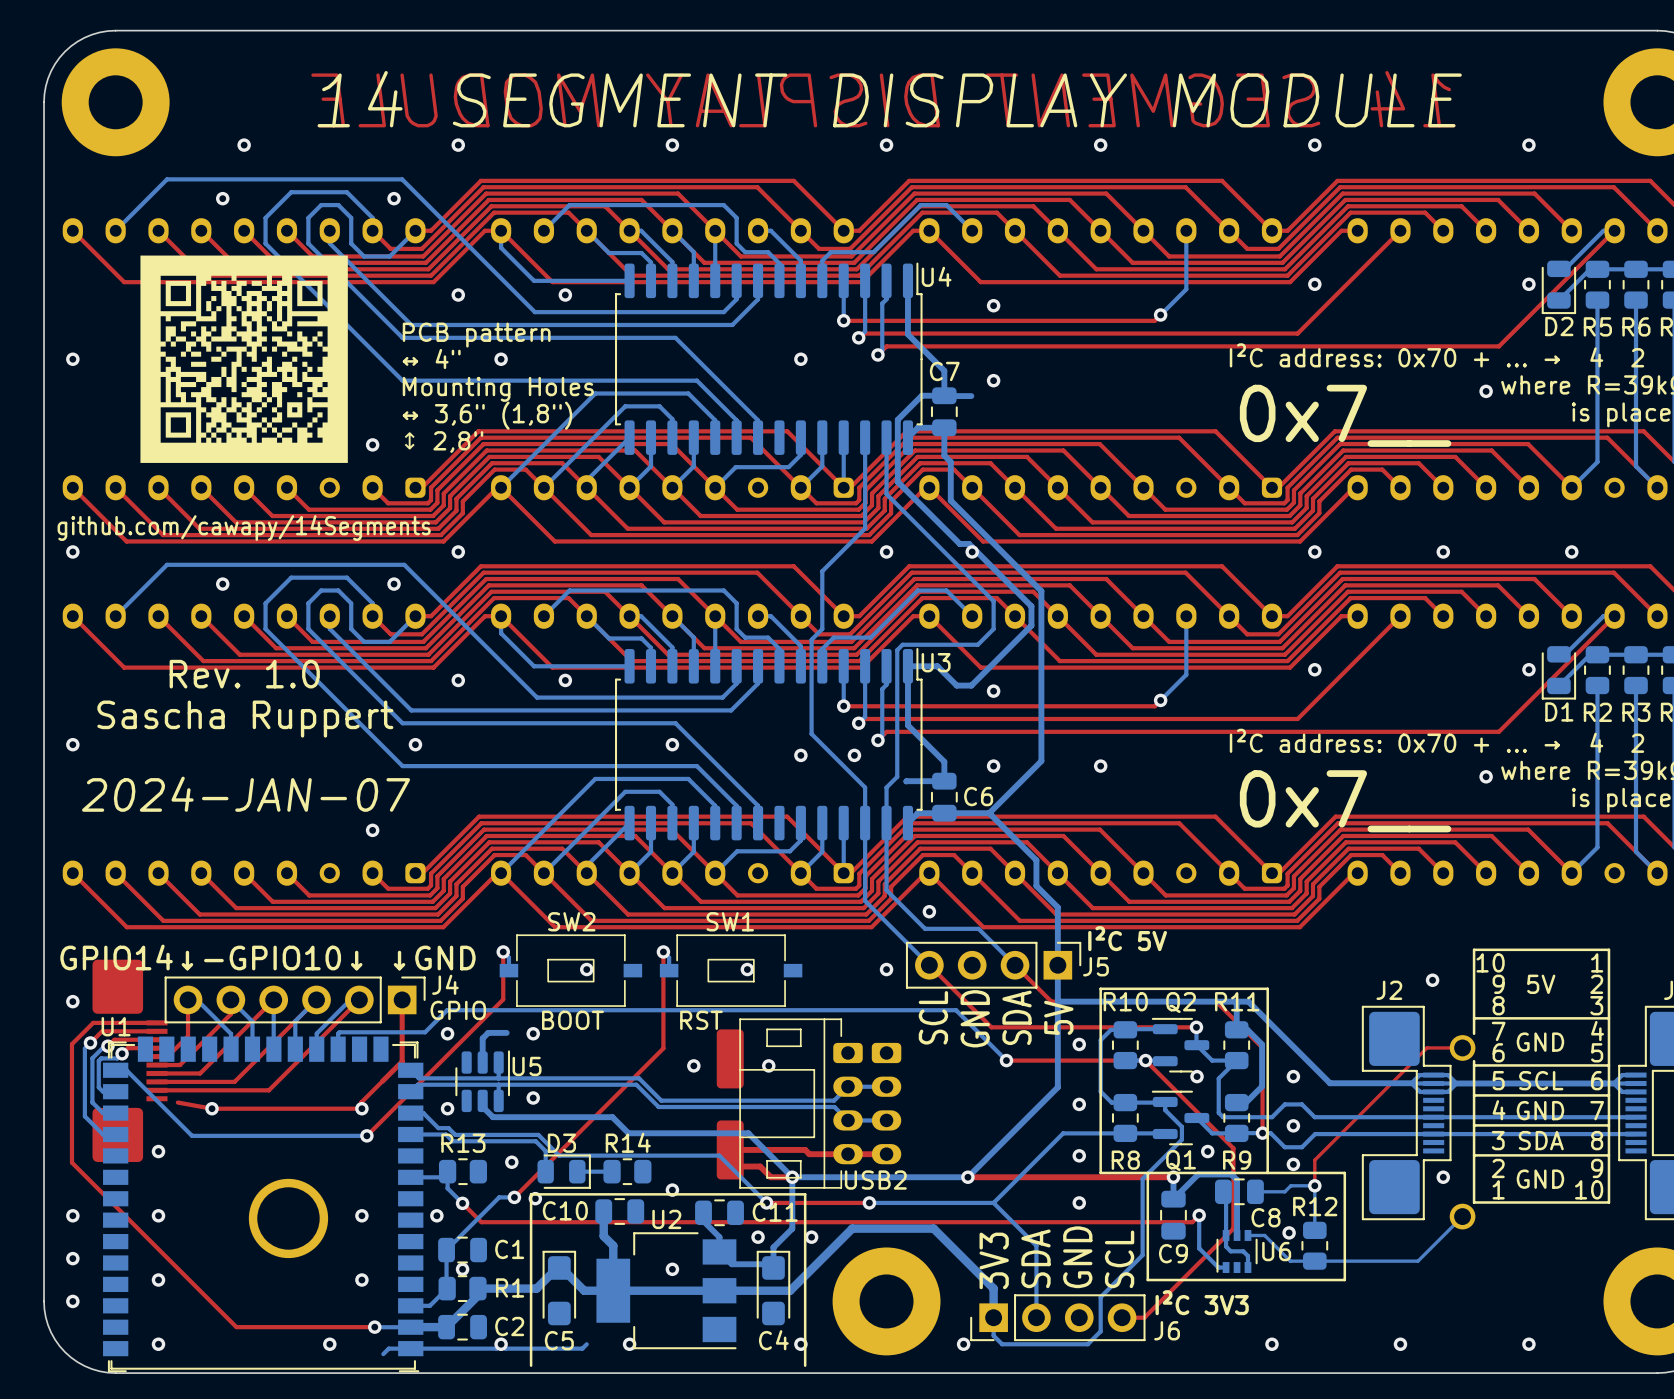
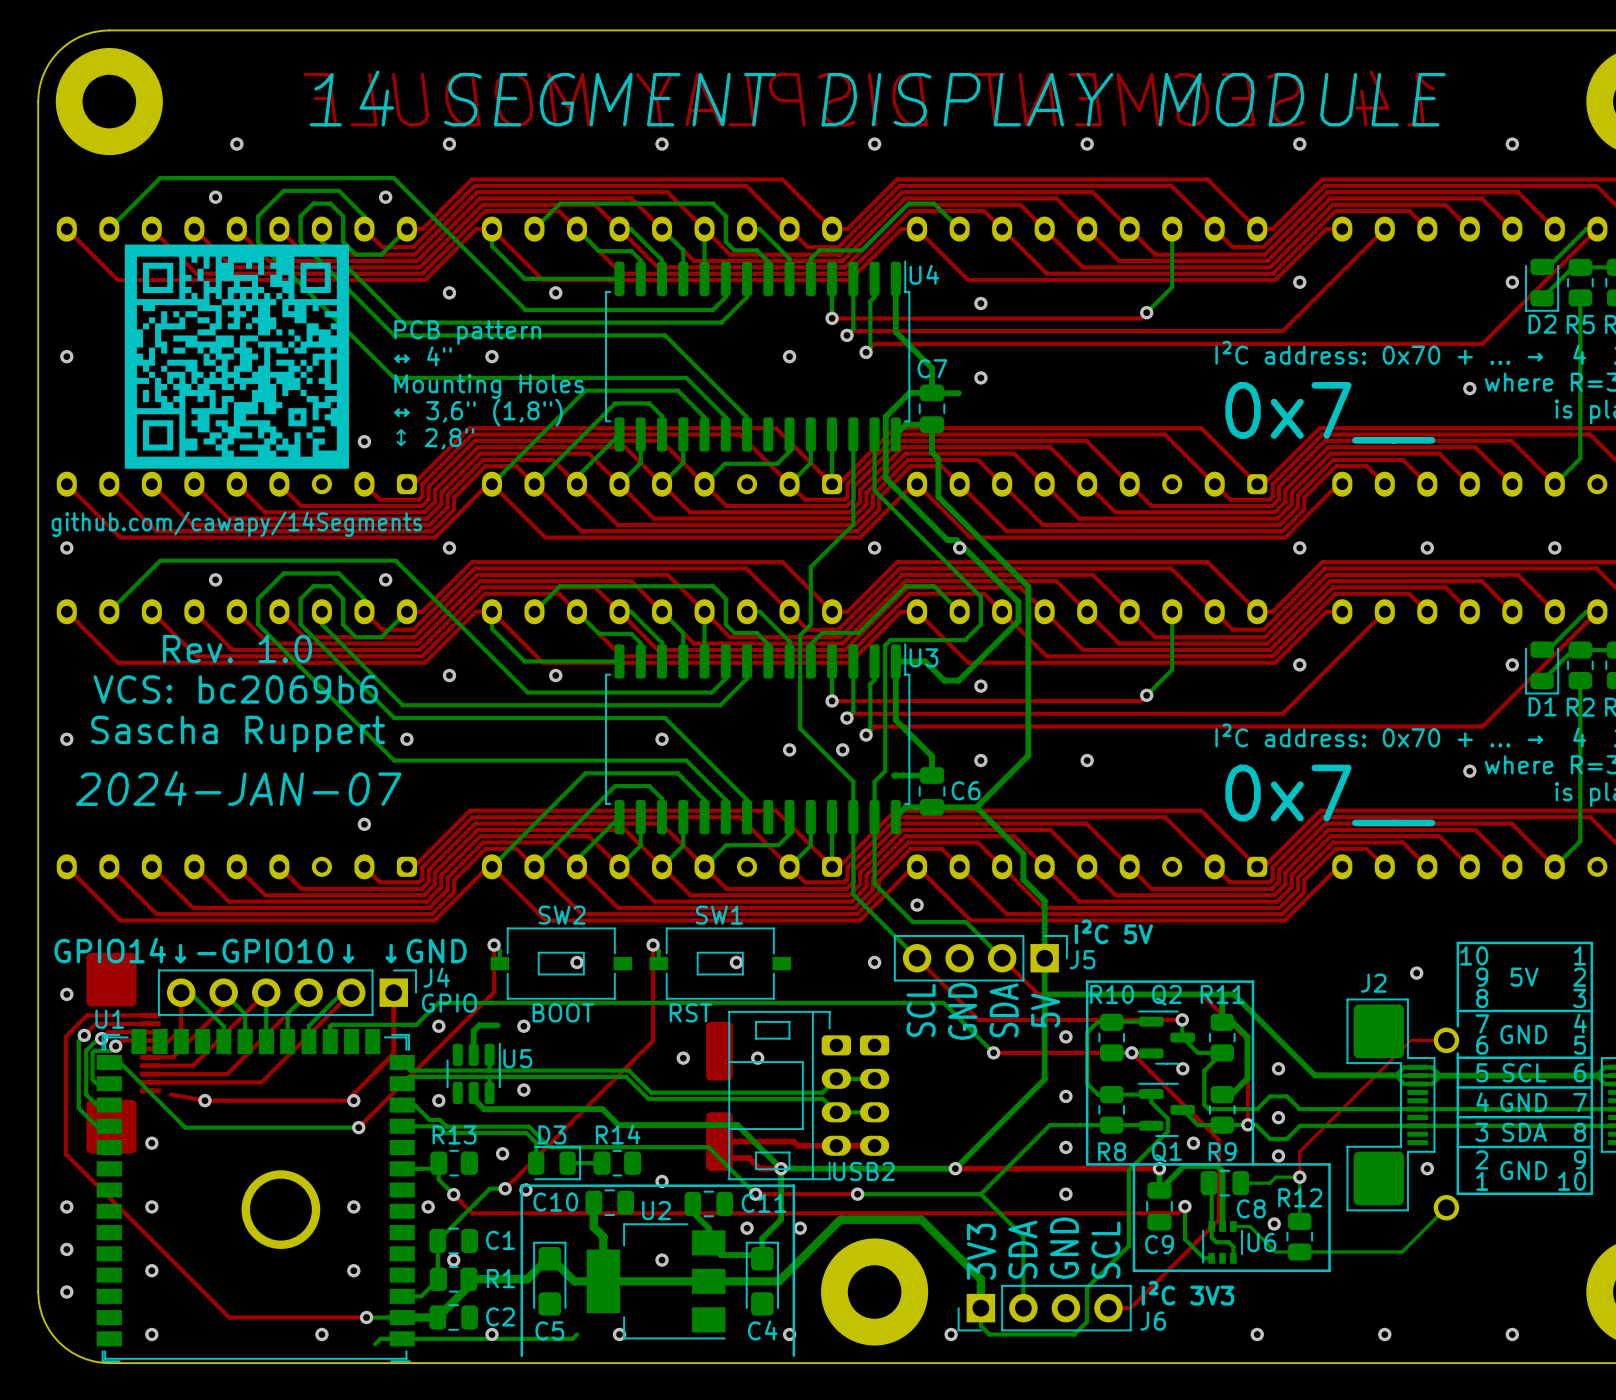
drawing shape: [140, 255, 348, 463] -> [124, 244, 349, 469]
text position: Rev. 1.0 (244, 674) -> Rev. 1.0 (237, 649)
text: none -> VCS: bc2069b6 (235, 689)
text position: Sascha Ruppert (245, 719) -> Sascha Ruppert (238, 734)

